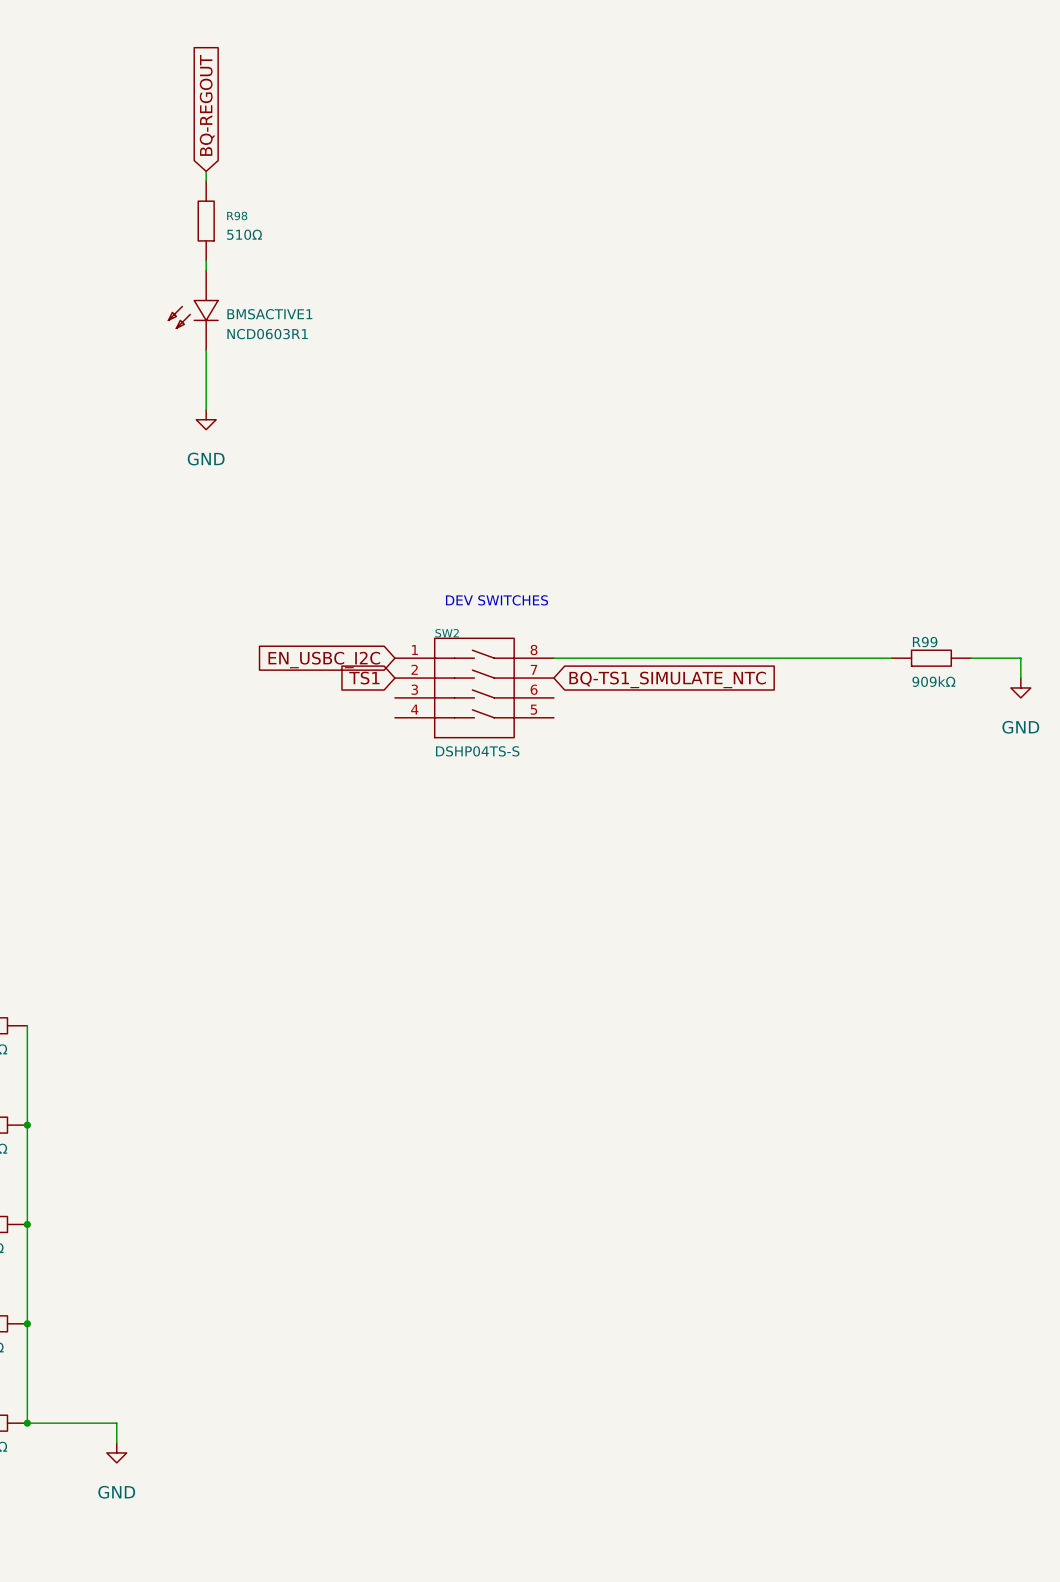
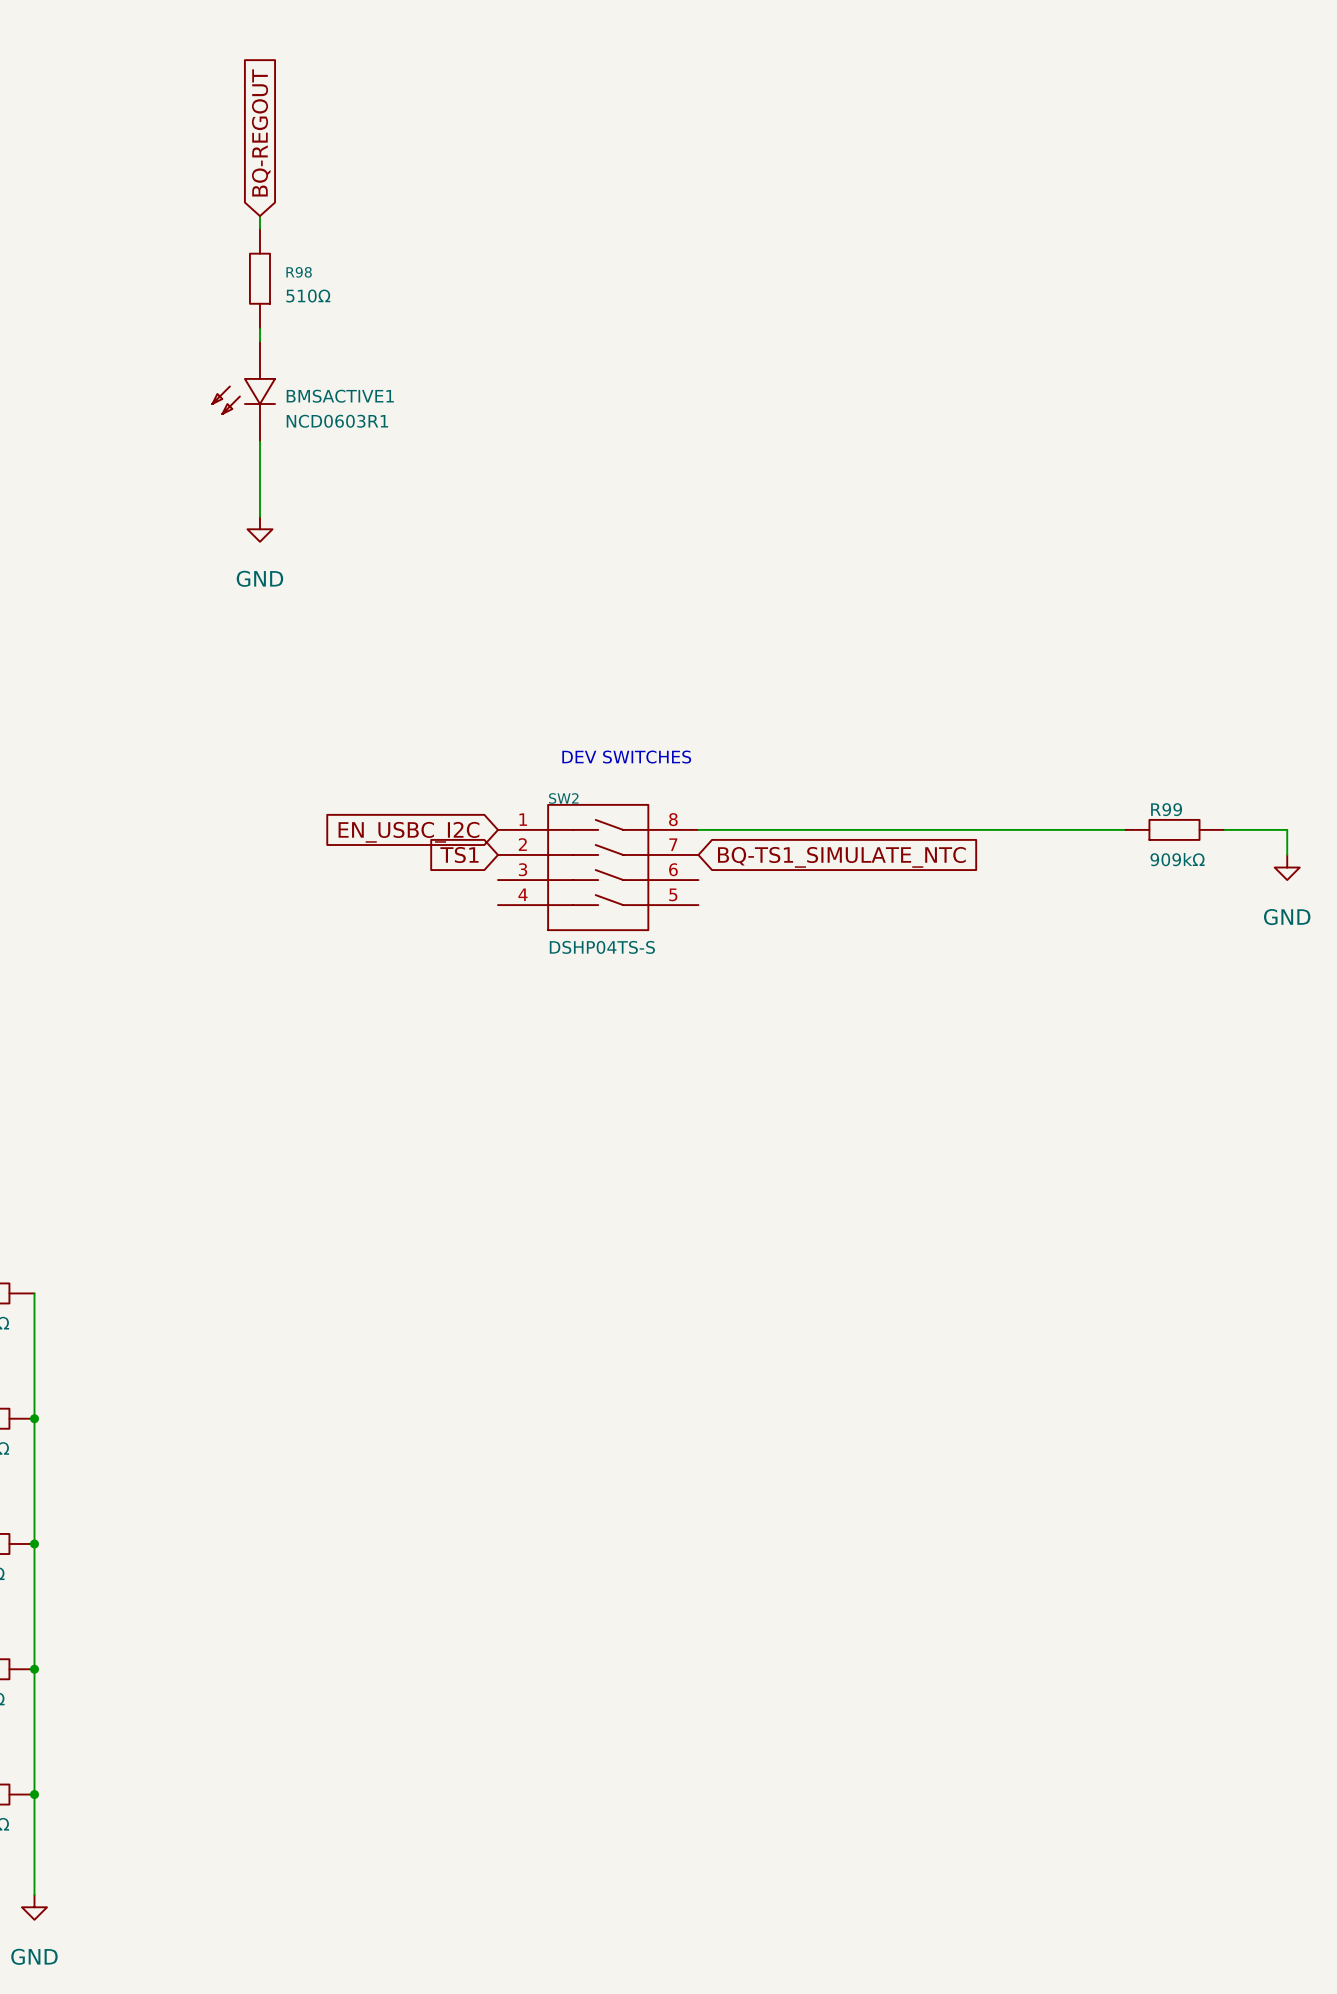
wire: (27, 1423) (116, 1423) (116, 1443) -> (34, 1794) (34, 1894)
power symbol position: GND (116, 1452) -> GND (34, 1907)

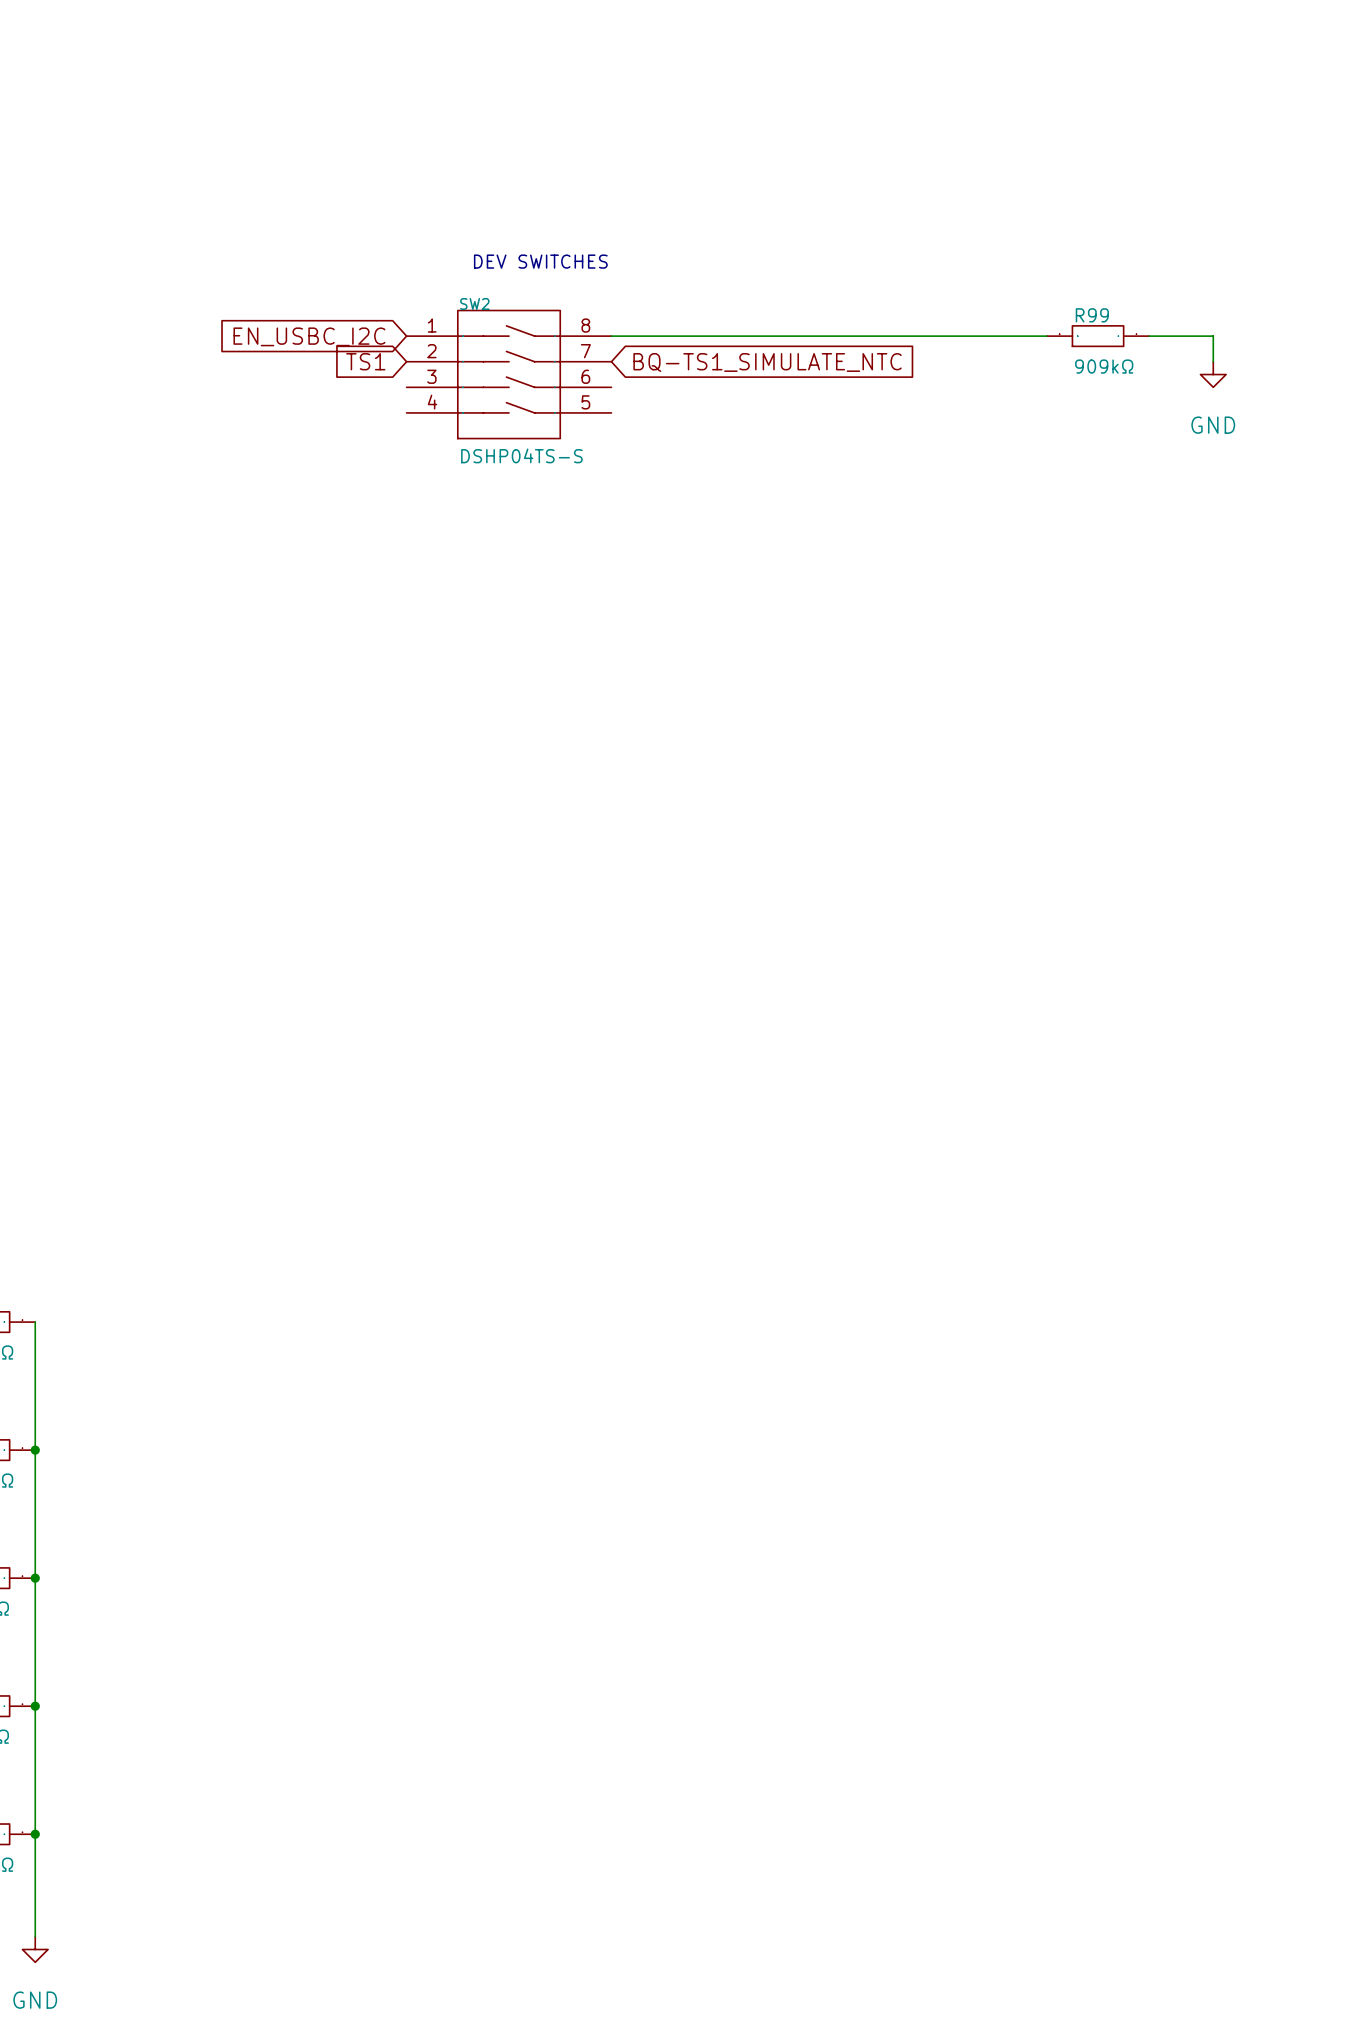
global label: BQ-REGOUT (261, 132) -> none
wire: (259, 216) (259, 228) -> none
text: none -> DEV SWITCHES (540, 261)
R98: 510Ω (259, 278) -> none
wire: (259, 328) (259, 341) -> none
wire: none -> (611, 336) (1046, 336)
wire: none -> (1149, 336) (1213, 336) (1213, 361)
global label: none -> EN_USBC_I2C (309, 336)
global label: none -> TS1 (365, 361)
global label: none -> BQ-TS1_SIMULATE_NTC (767, 362)
power symbol: none -> GND (1213, 374)
BMSACTIVE1: NCD0603R1 (243, 391) -> none
wire: (259, 441) (259, 516) -> none
power symbol: GND (259, 529) -> none
text: DEV SWITCHES (626, 757) -> none
wire: (698, 829) (1124, 829) -> none
R99 position: (1174, 829) -> (1098, 336)
wire: (1224, 829) (1287, 829) (1287, 854) -> none
global label: EN_USBC_I2C (408, 832) -> none
global label: TS1 (459, 855) -> none
global label: BQ-TS1_SIMULATE_NTC (841, 857) -> none
SW2 position: (598, 867) -> (509, 374)
power symbol: GND (1287, 867) -> none

